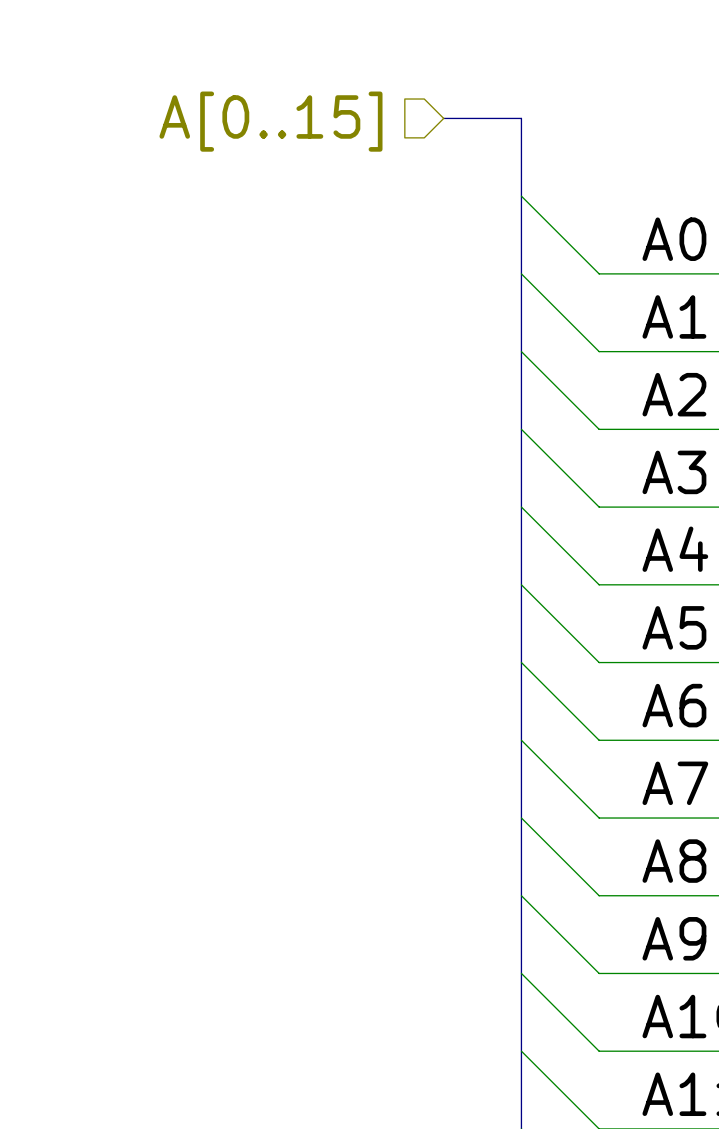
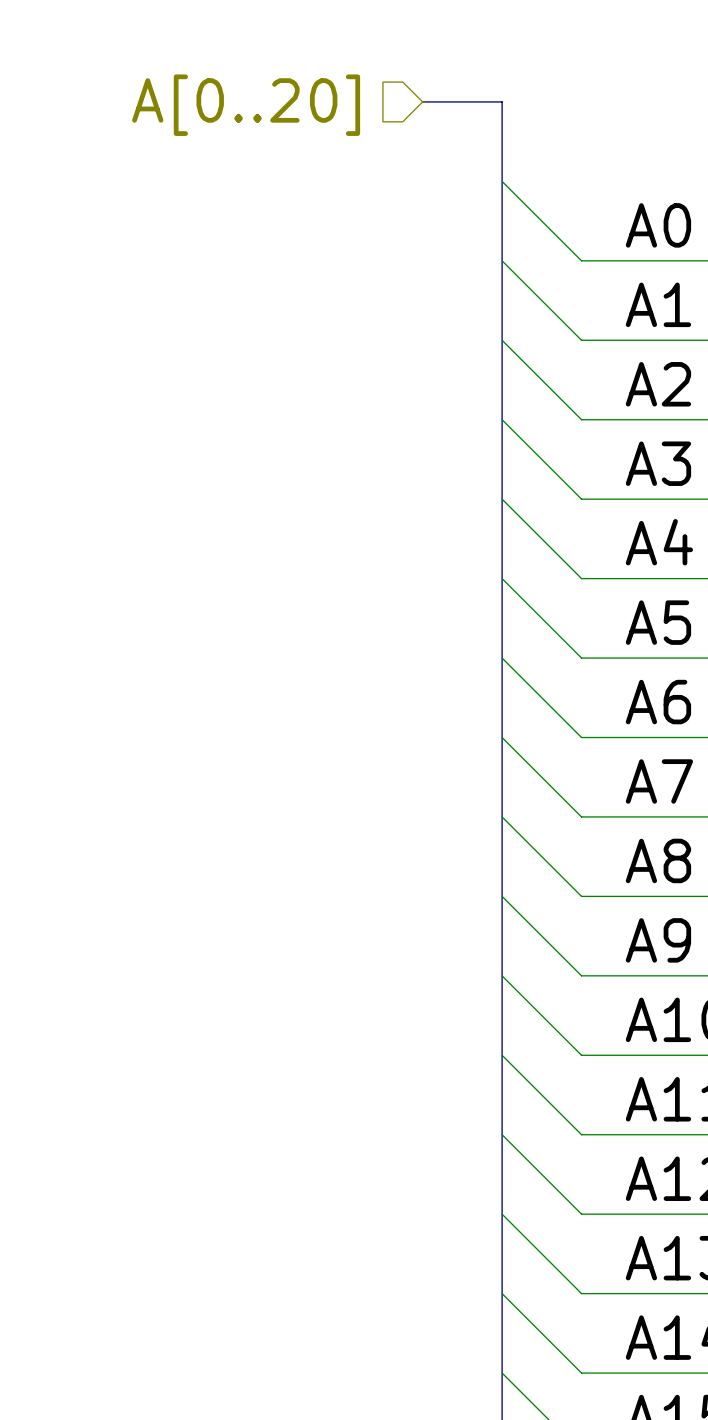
hierarchical label: A[0..15] (270, 121) -> A[0..20] (246, 105)

